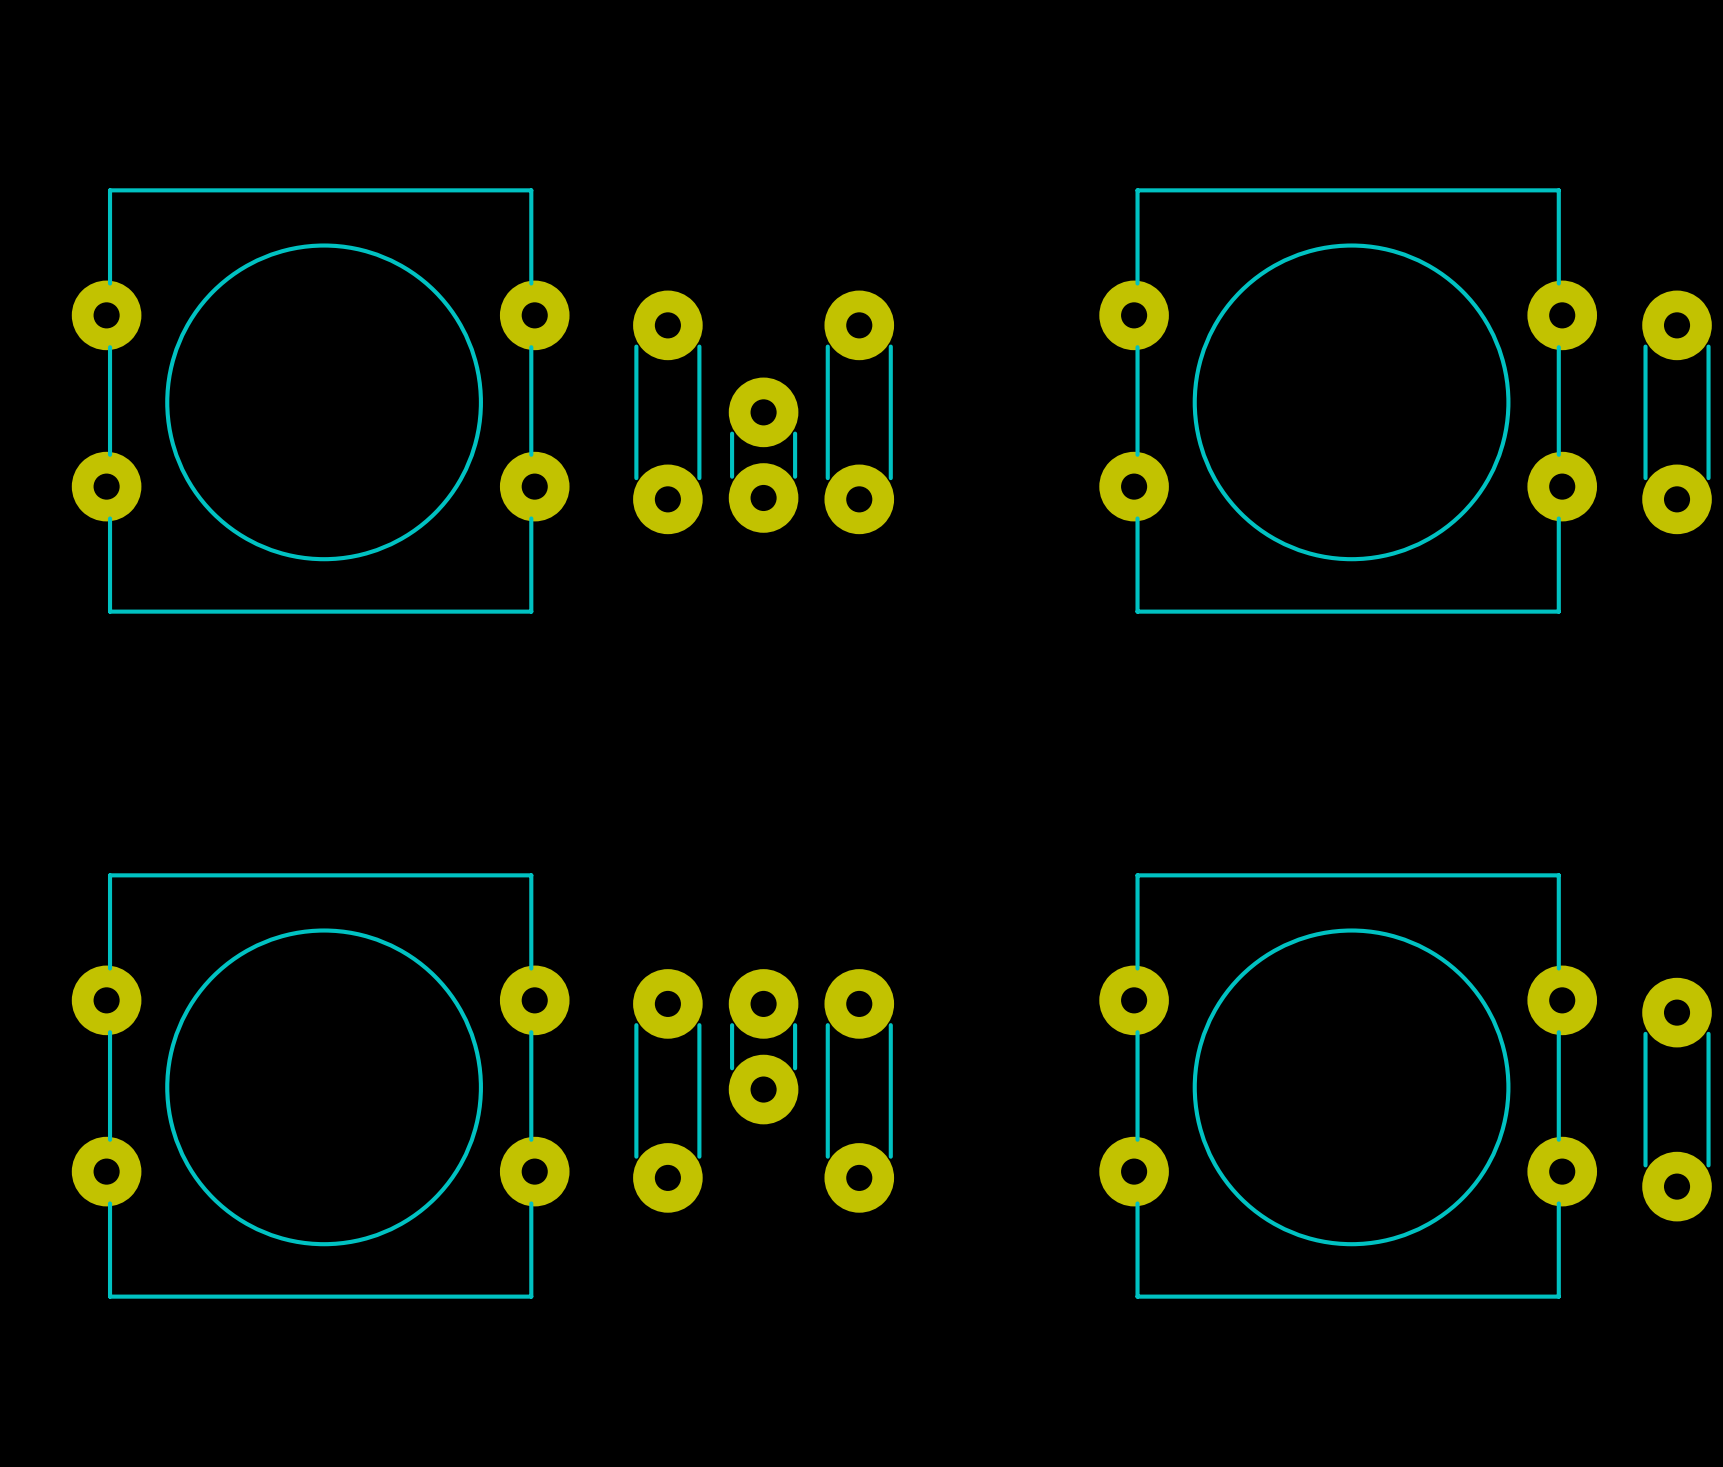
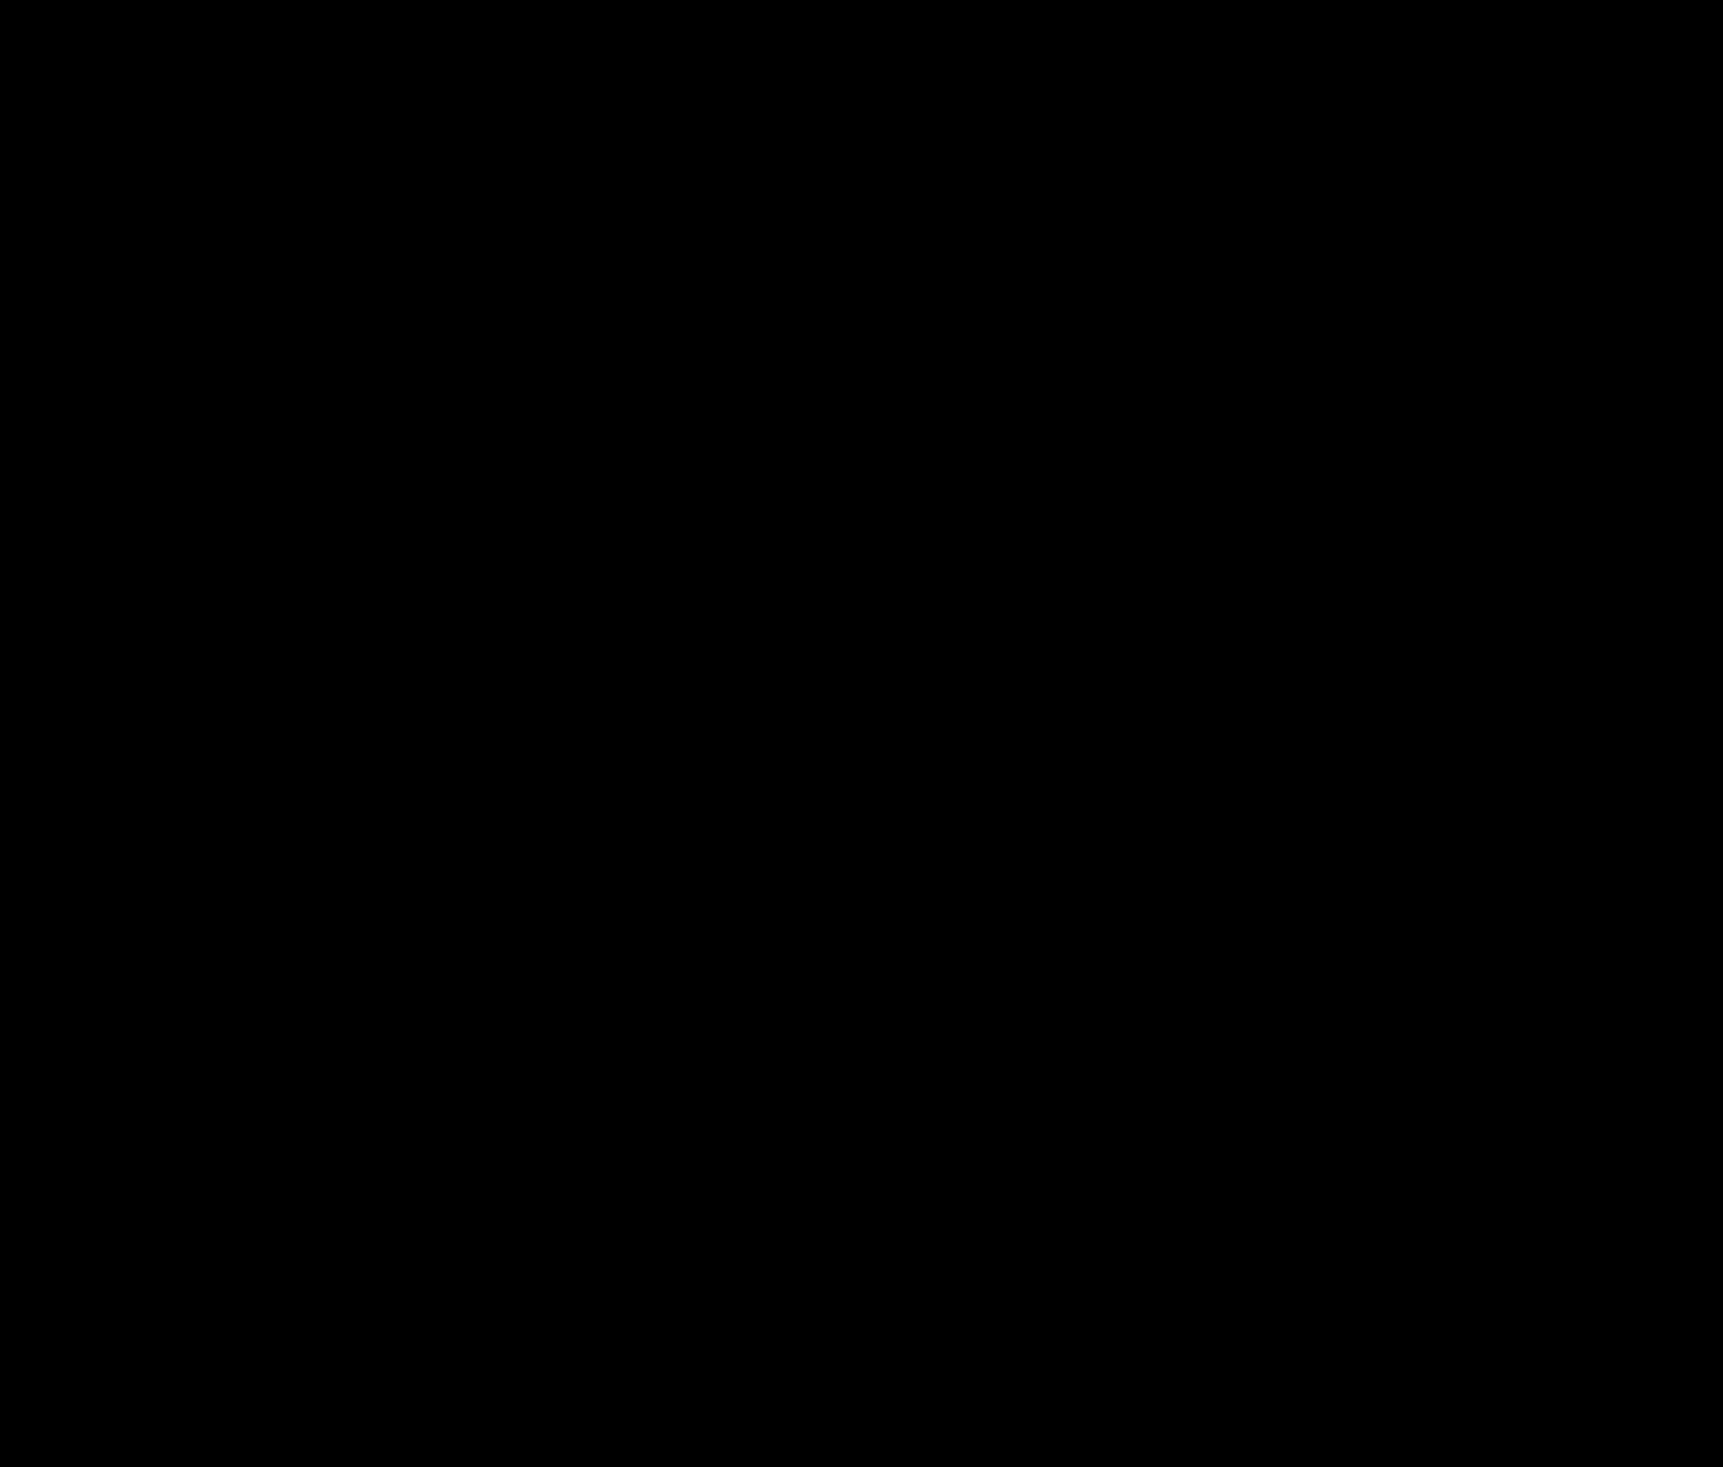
part: (320, 400) -> none
part: (1348, 400) -> none
part: (667, 412) -> none
part: (859, 412) -> none
part: (1677, 412) -> none
part: (763, 455) -> none
part: (763, 1046) -> none
part: (320, 1085) -> none
part: (1348, 1085) -> none
part: (667, 1090) -> none
part: (859, 1090) -> none
part: (1677, 1099) -> none

